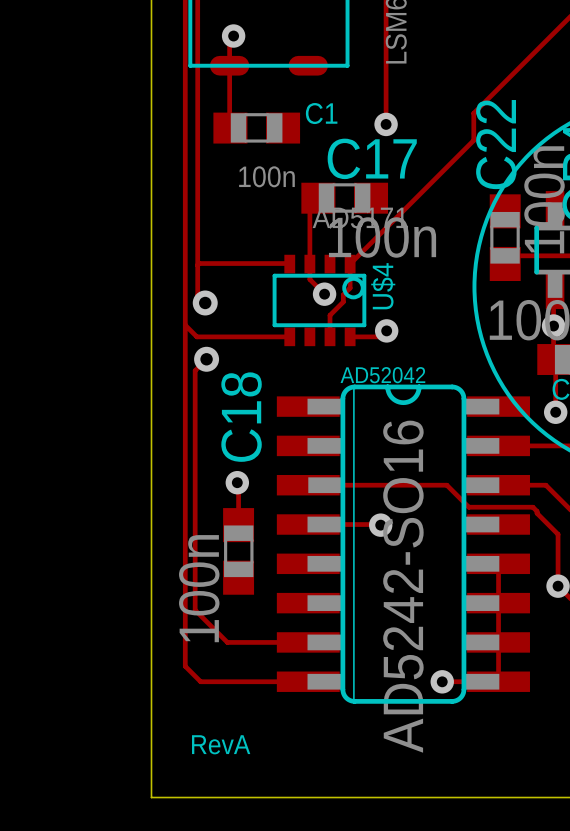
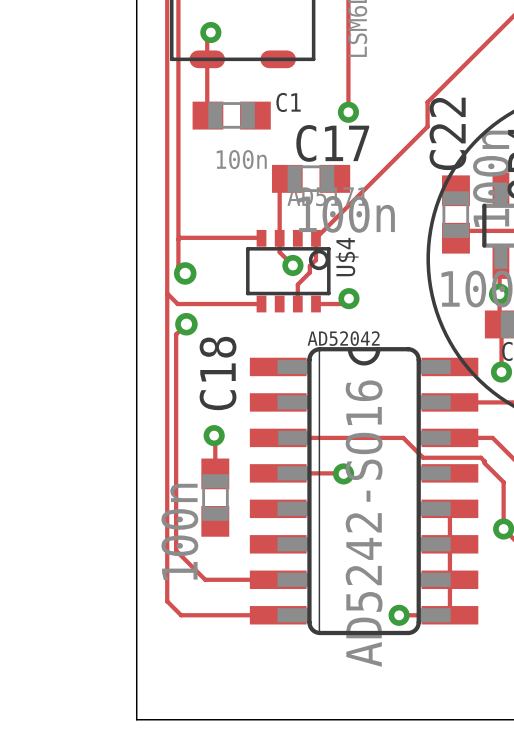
drawing: [192, 735, 251, 755] -> none

